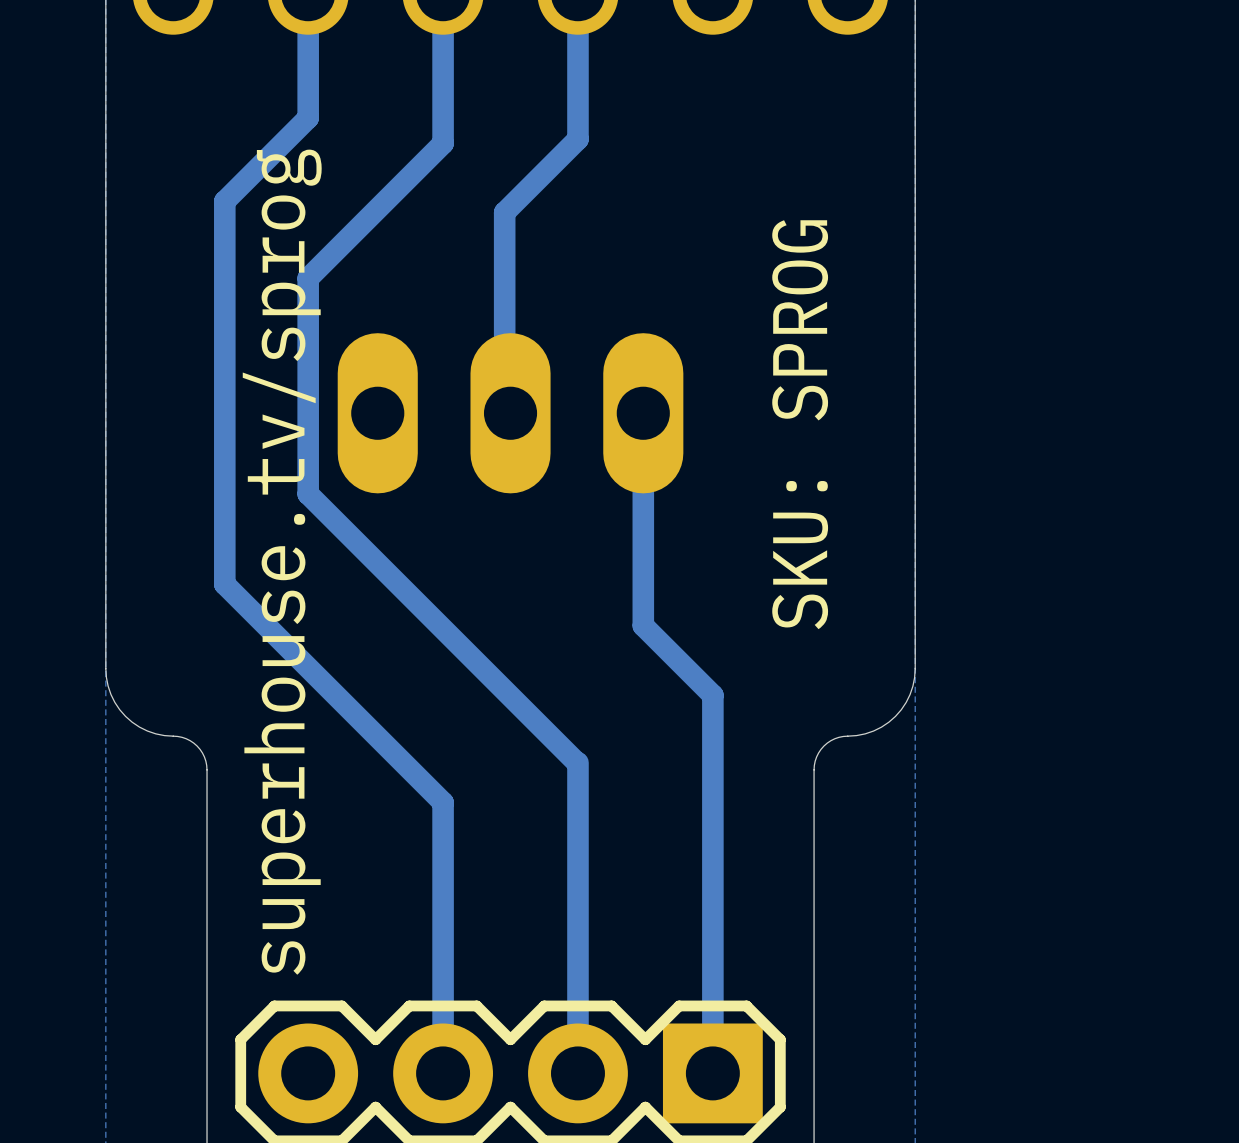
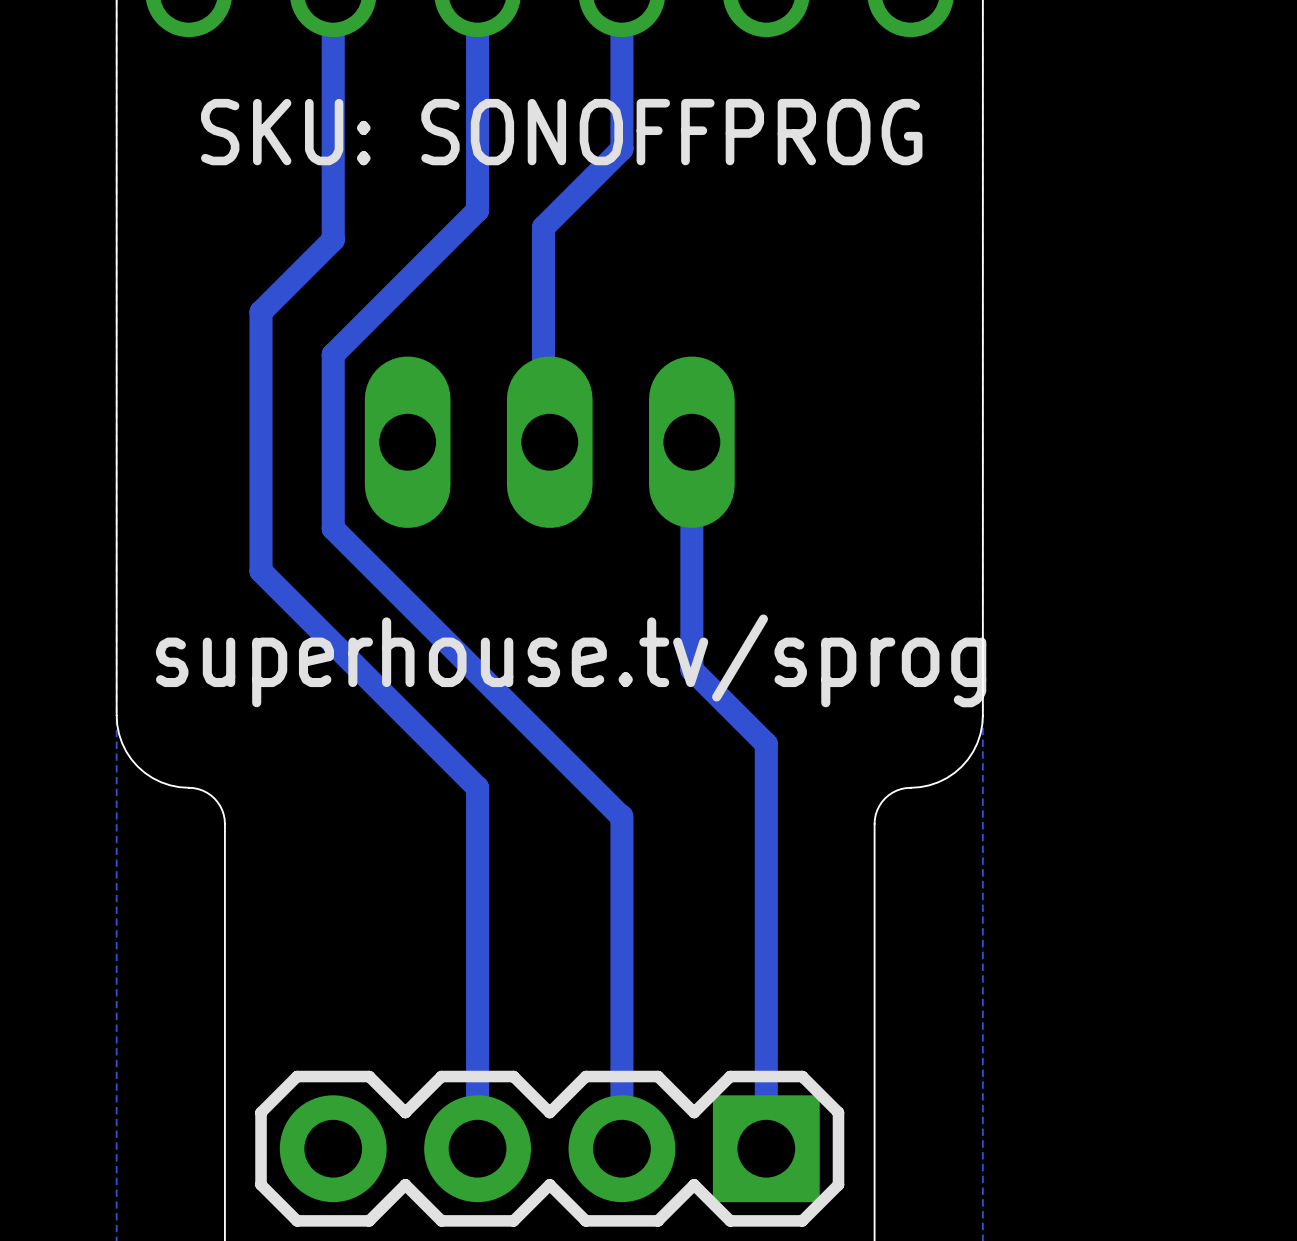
track: (308, 117) (224, 201) (224, 584) (443, 802) -> (333, 126) (333, 239) (261, 312) (261, 571) (477, 787) (477, 858)
track: (443, 143) (308, 278) (308, 331) -> (477, 153) (477, 210) (333, 354)
text: SKU: SPROG (800, 424) -> SKU: SONOFFPROG (561, 132)
text rotation: 0° (282, 562) -> 90° clockwise (571, 660)

